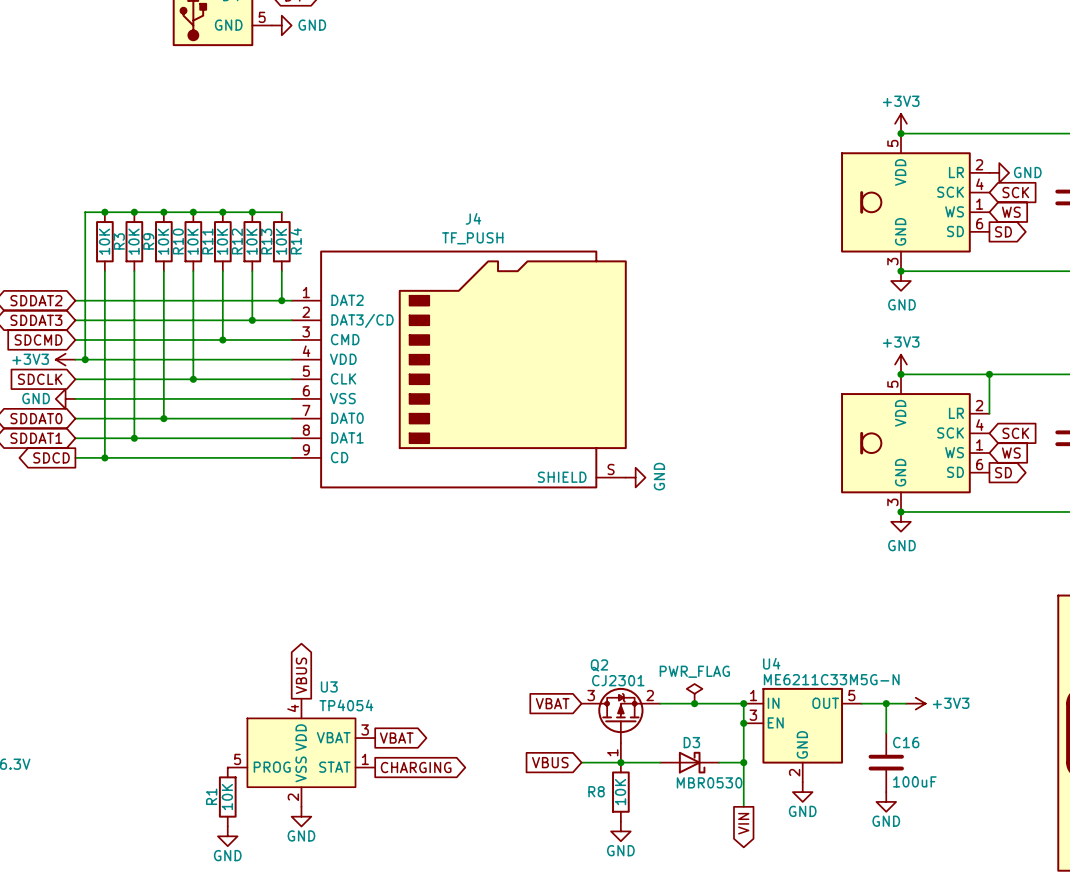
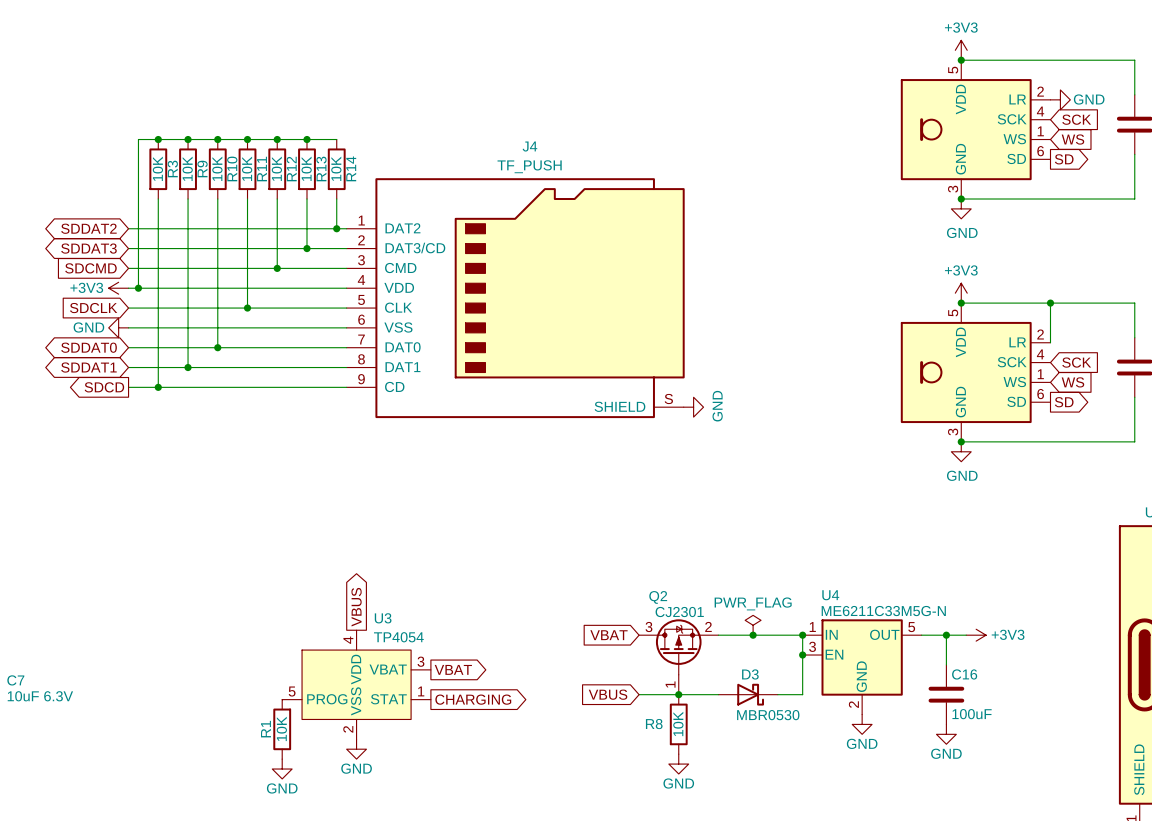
wire: (743, 762) (743, 806) -> none
junction: (743, 762) -> none
global label: VIN (743, 823) -> none

